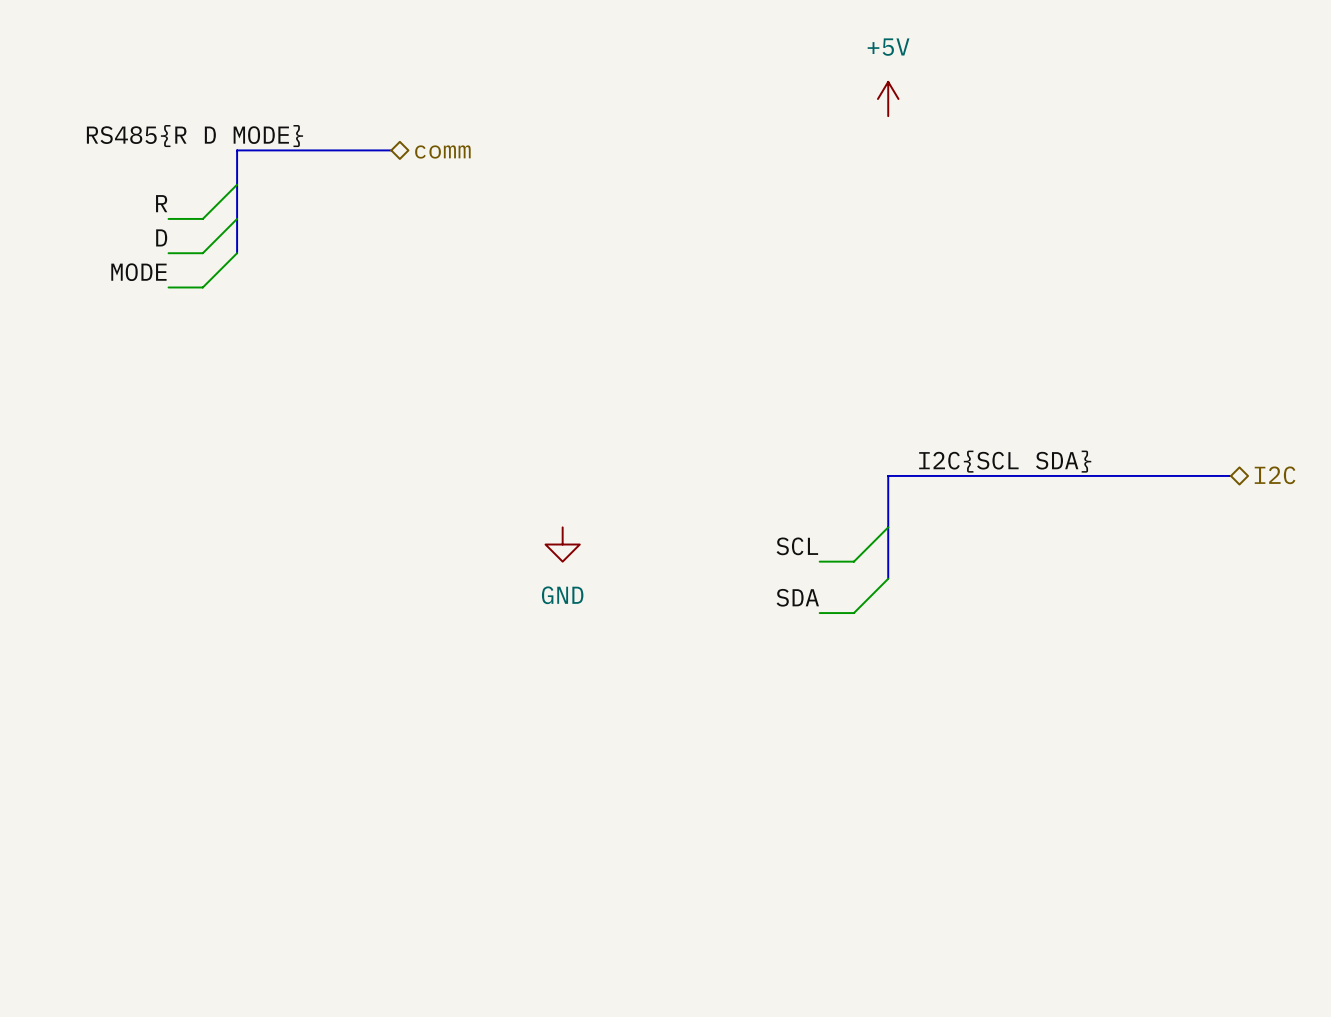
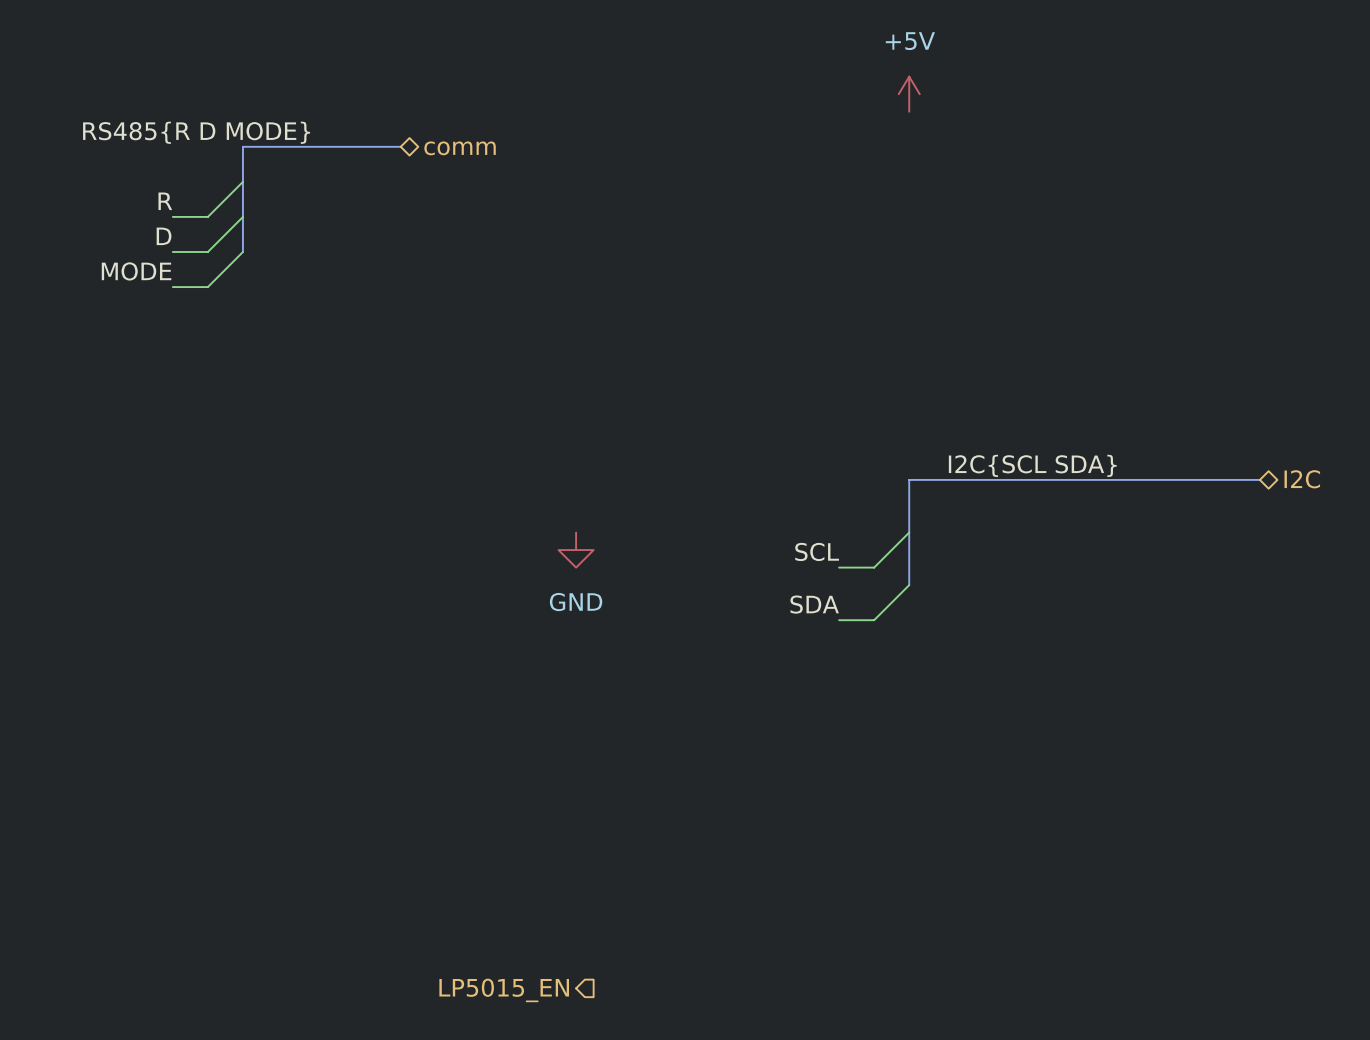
hierarchical label: none -> LP5015_EN (504, 990)

